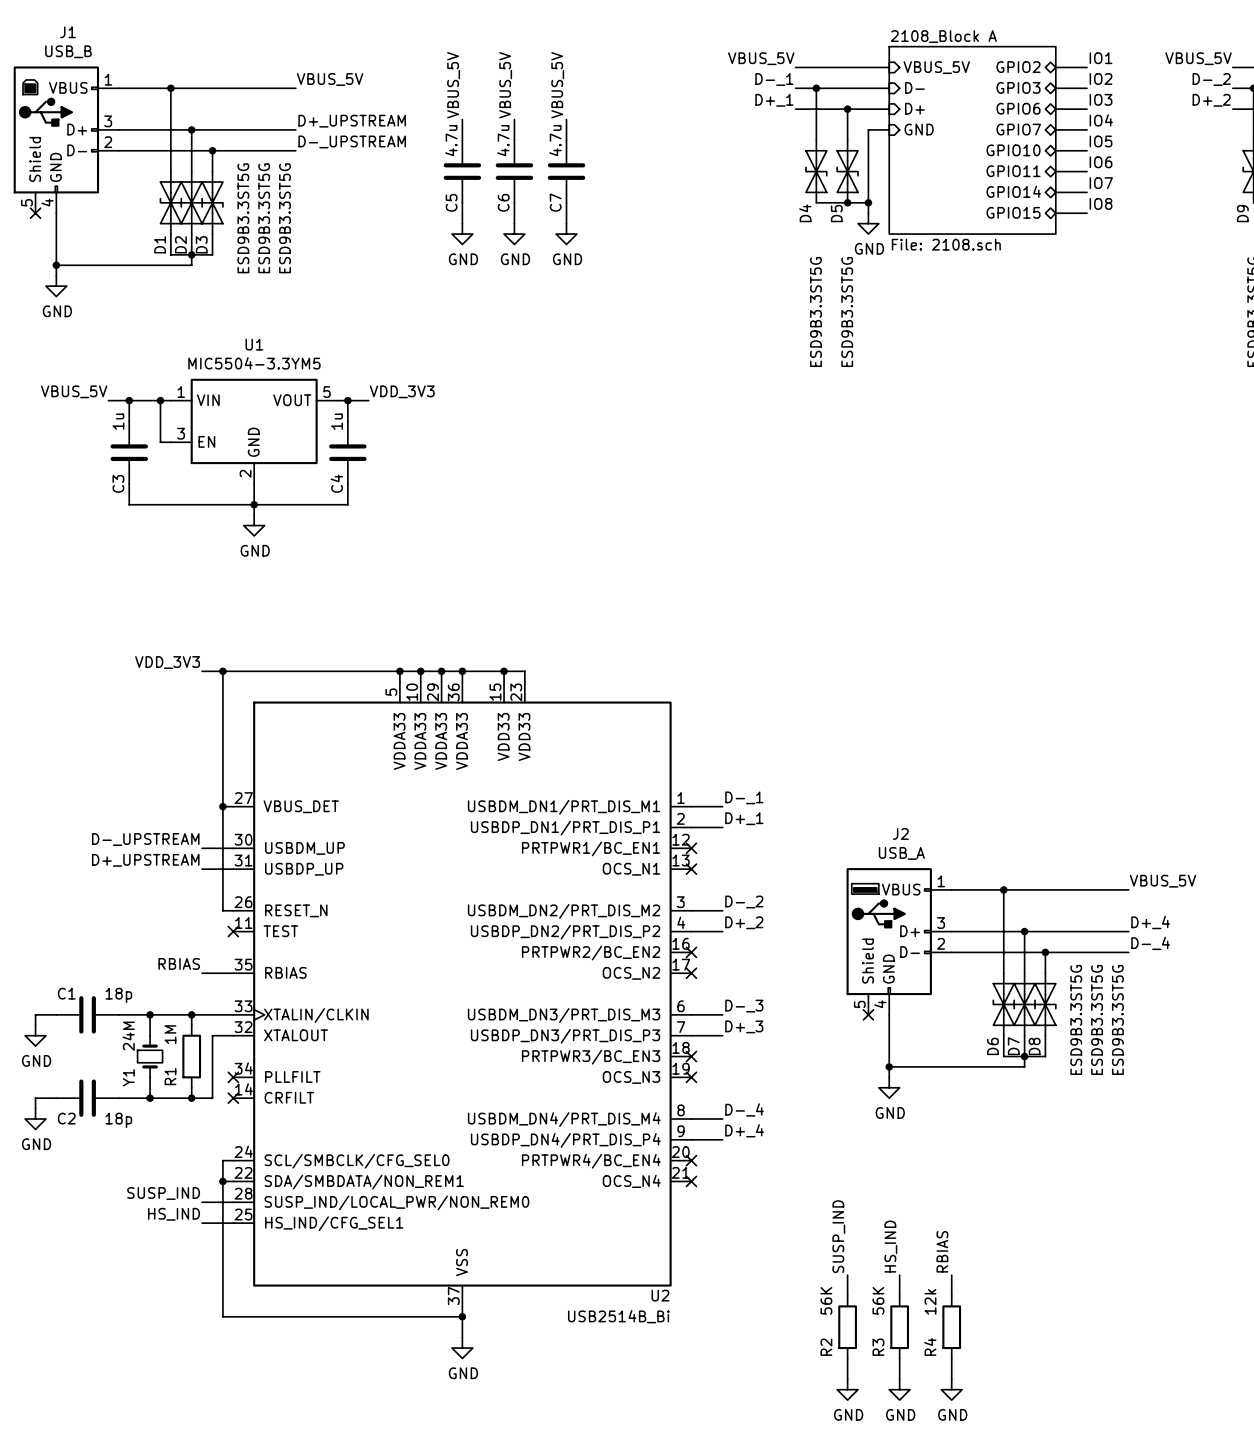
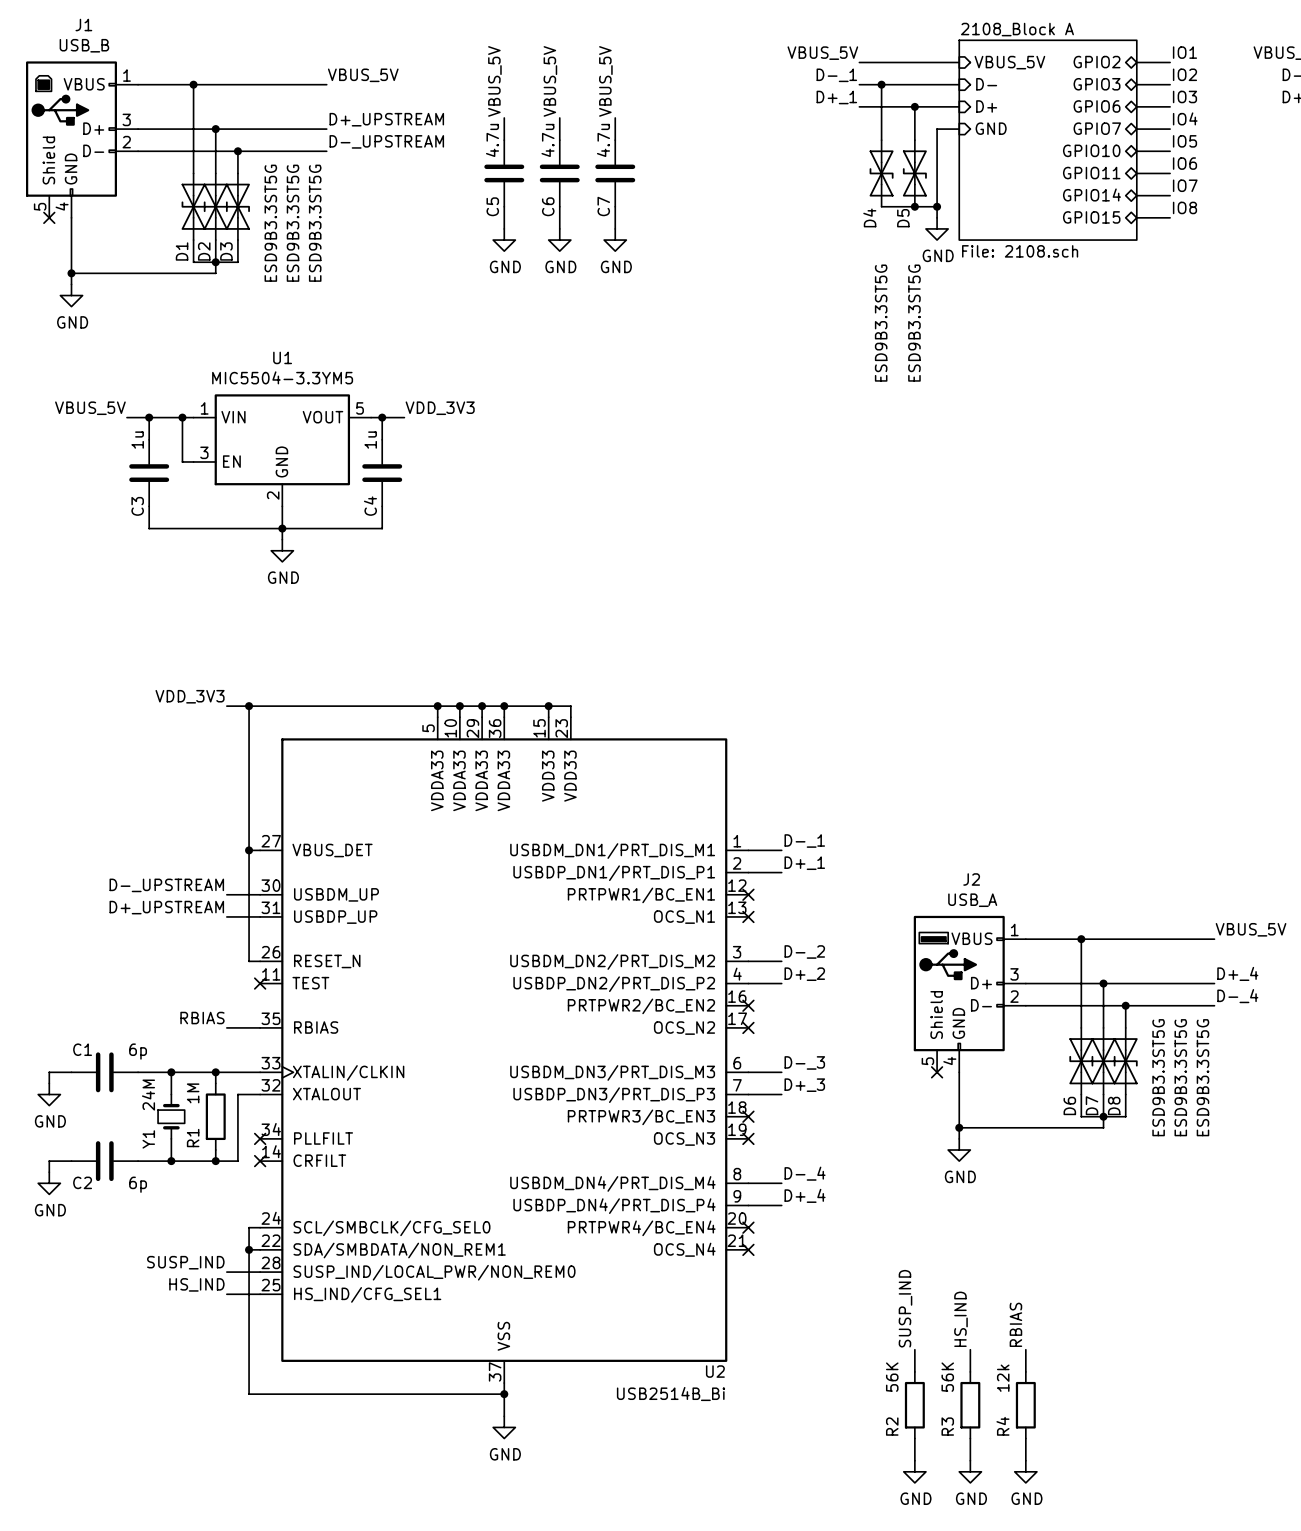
C1 value: 18p (118, 995) -> 6p (138, 1051)
C2 value: 18p (118, 1120) -> 6p (138, 1184)

